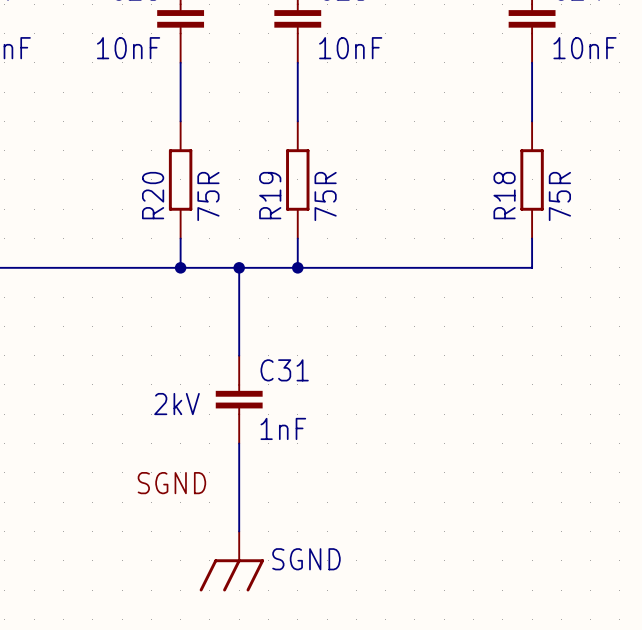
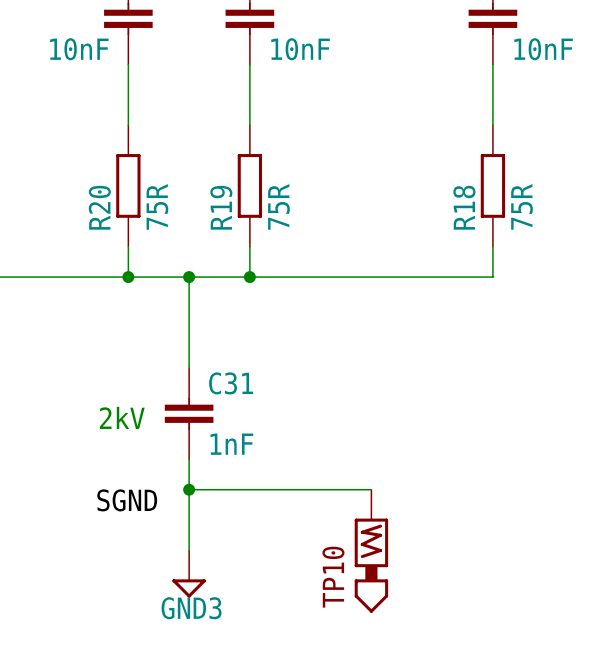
wire: none -> (189, 489) (371, 489)
junction: none -> (189, 489)
TP10: none -> (371, 551)
power symbol: SGND (231, 561) -> GND3 (189, 574)

